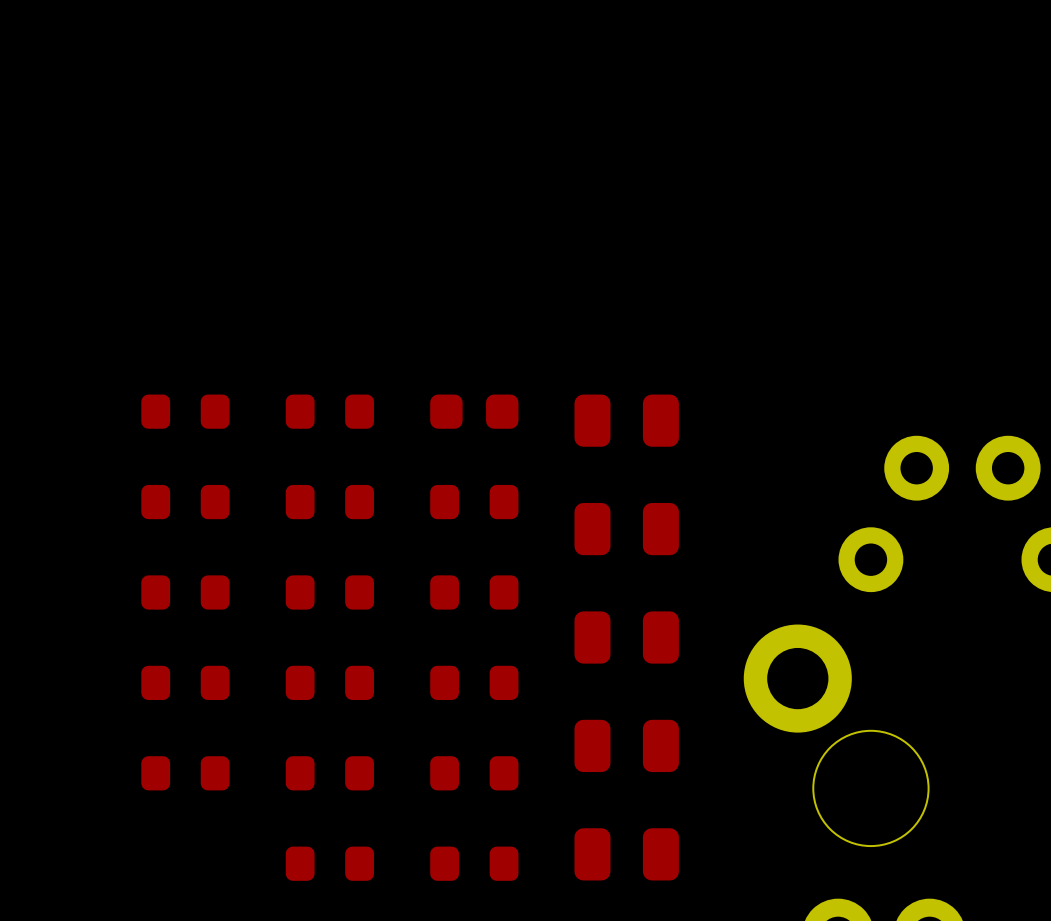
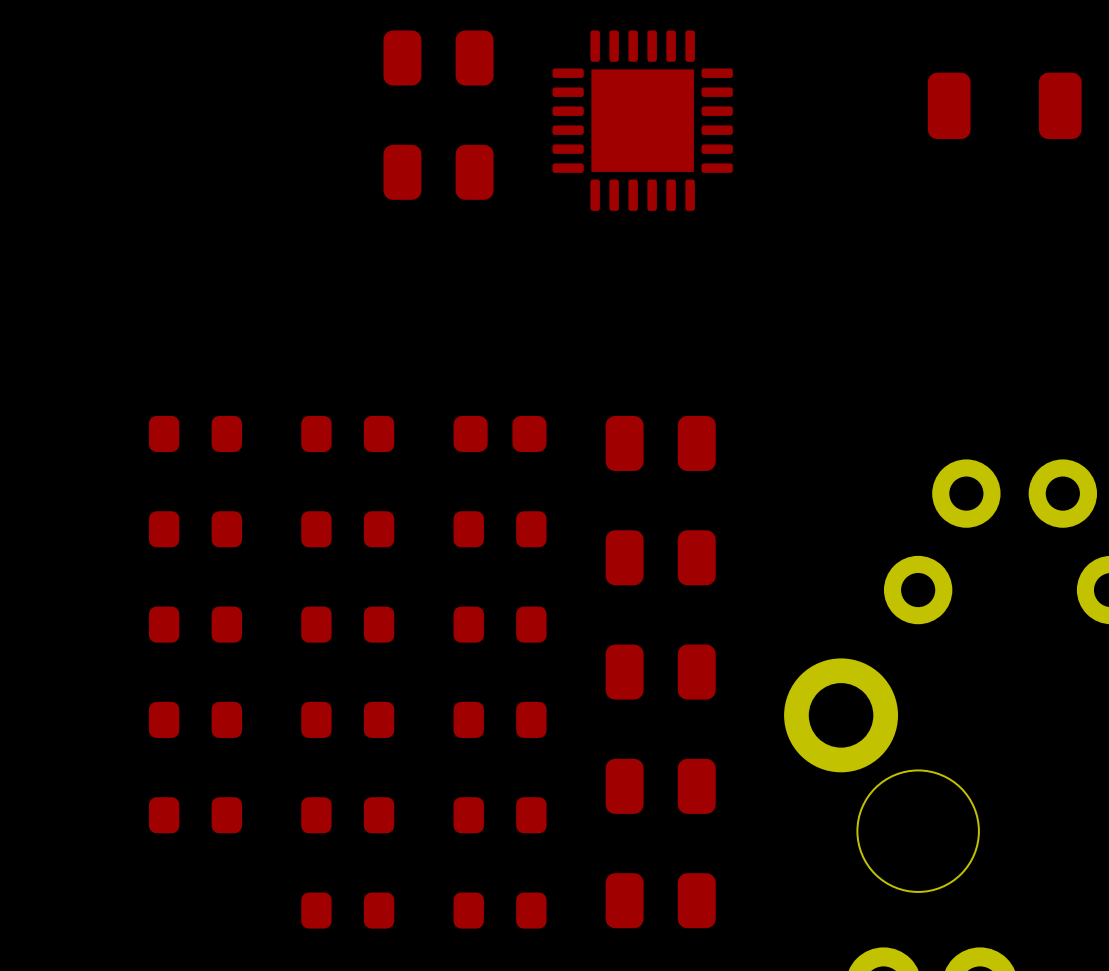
part: none -> (438, 58)
part: none -> (1004, 105)
part: none -> (642, 120)
part: none -> (438, 172)

